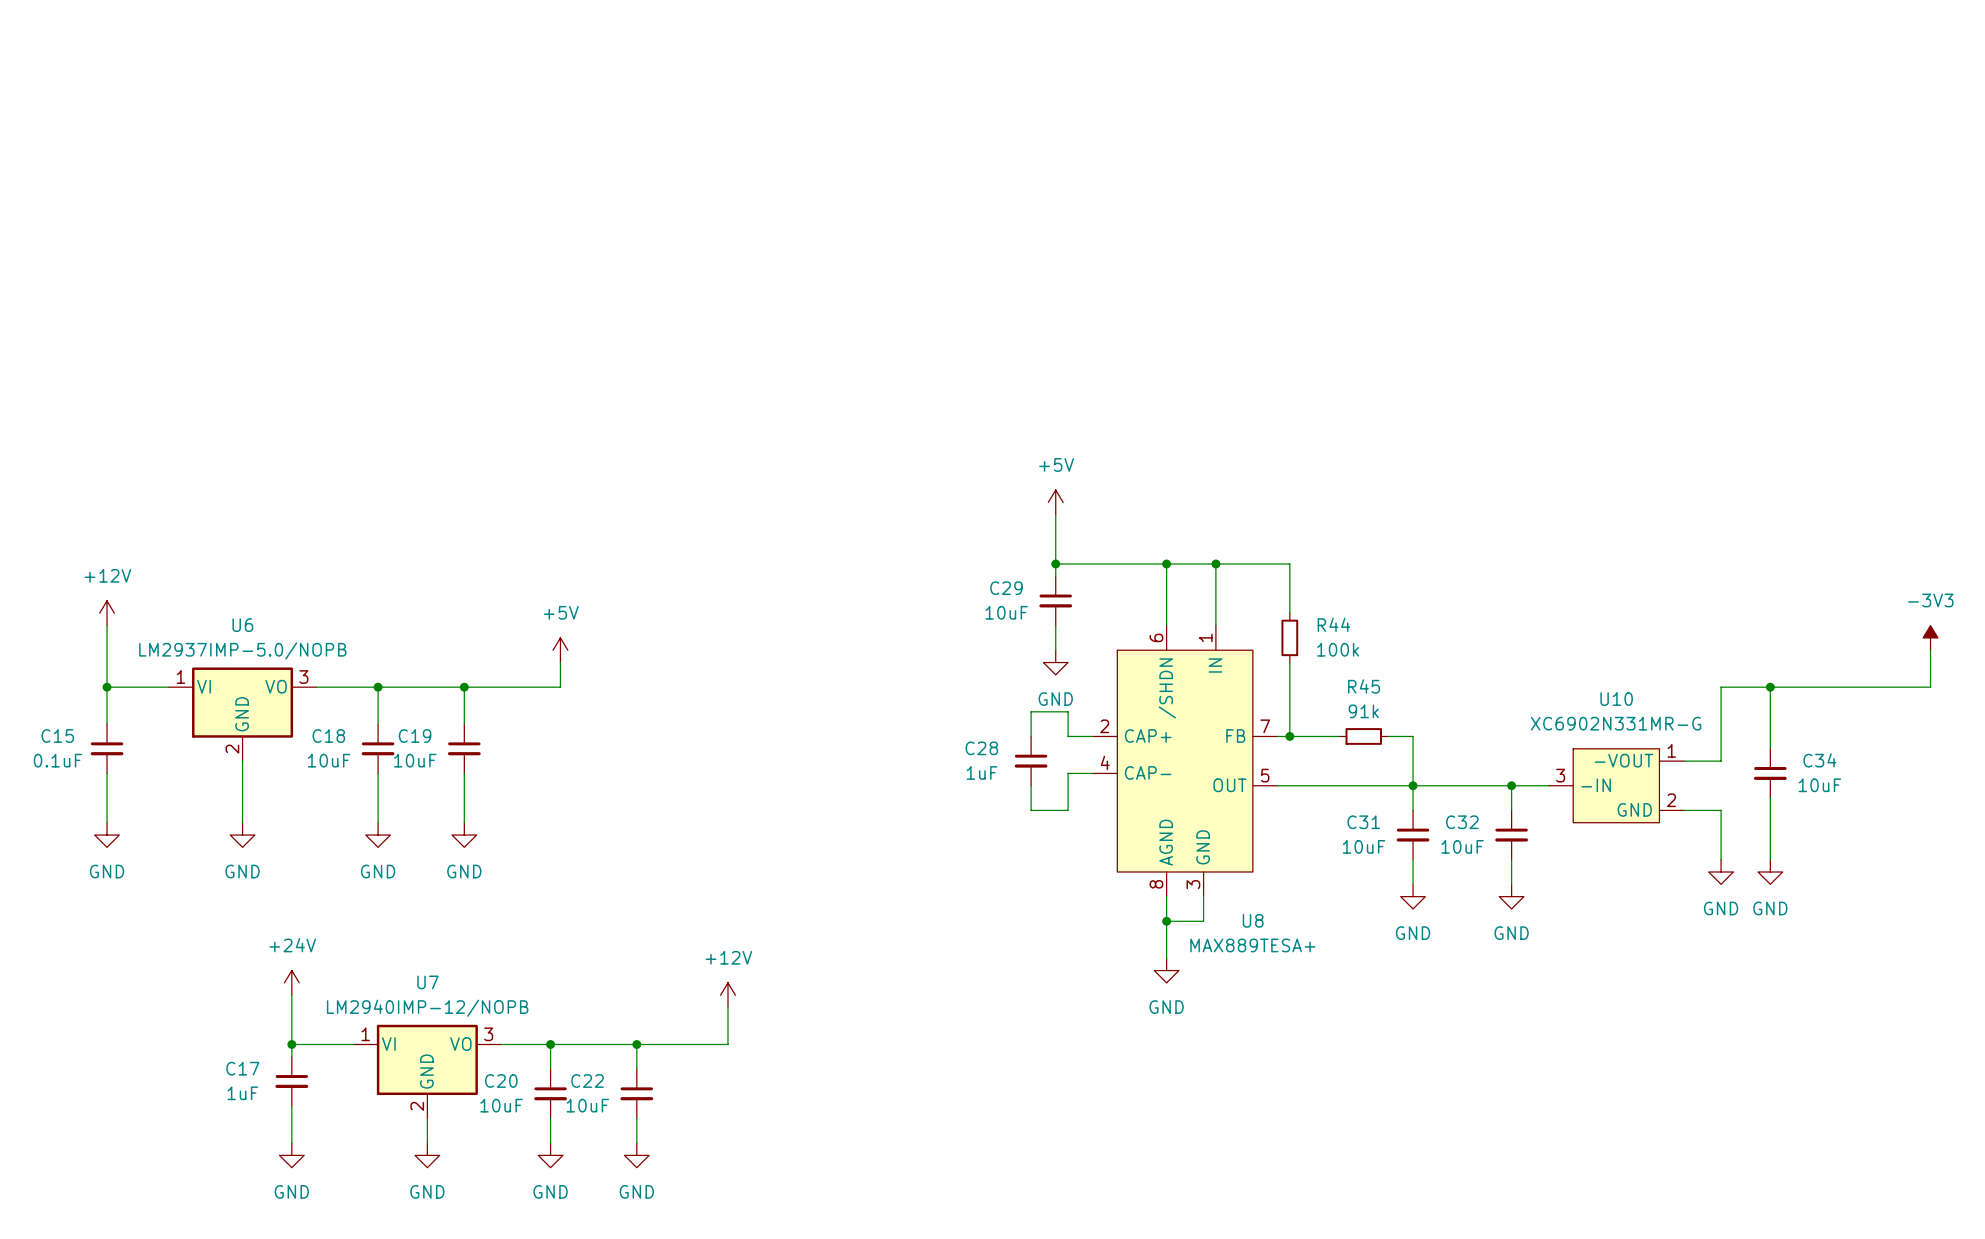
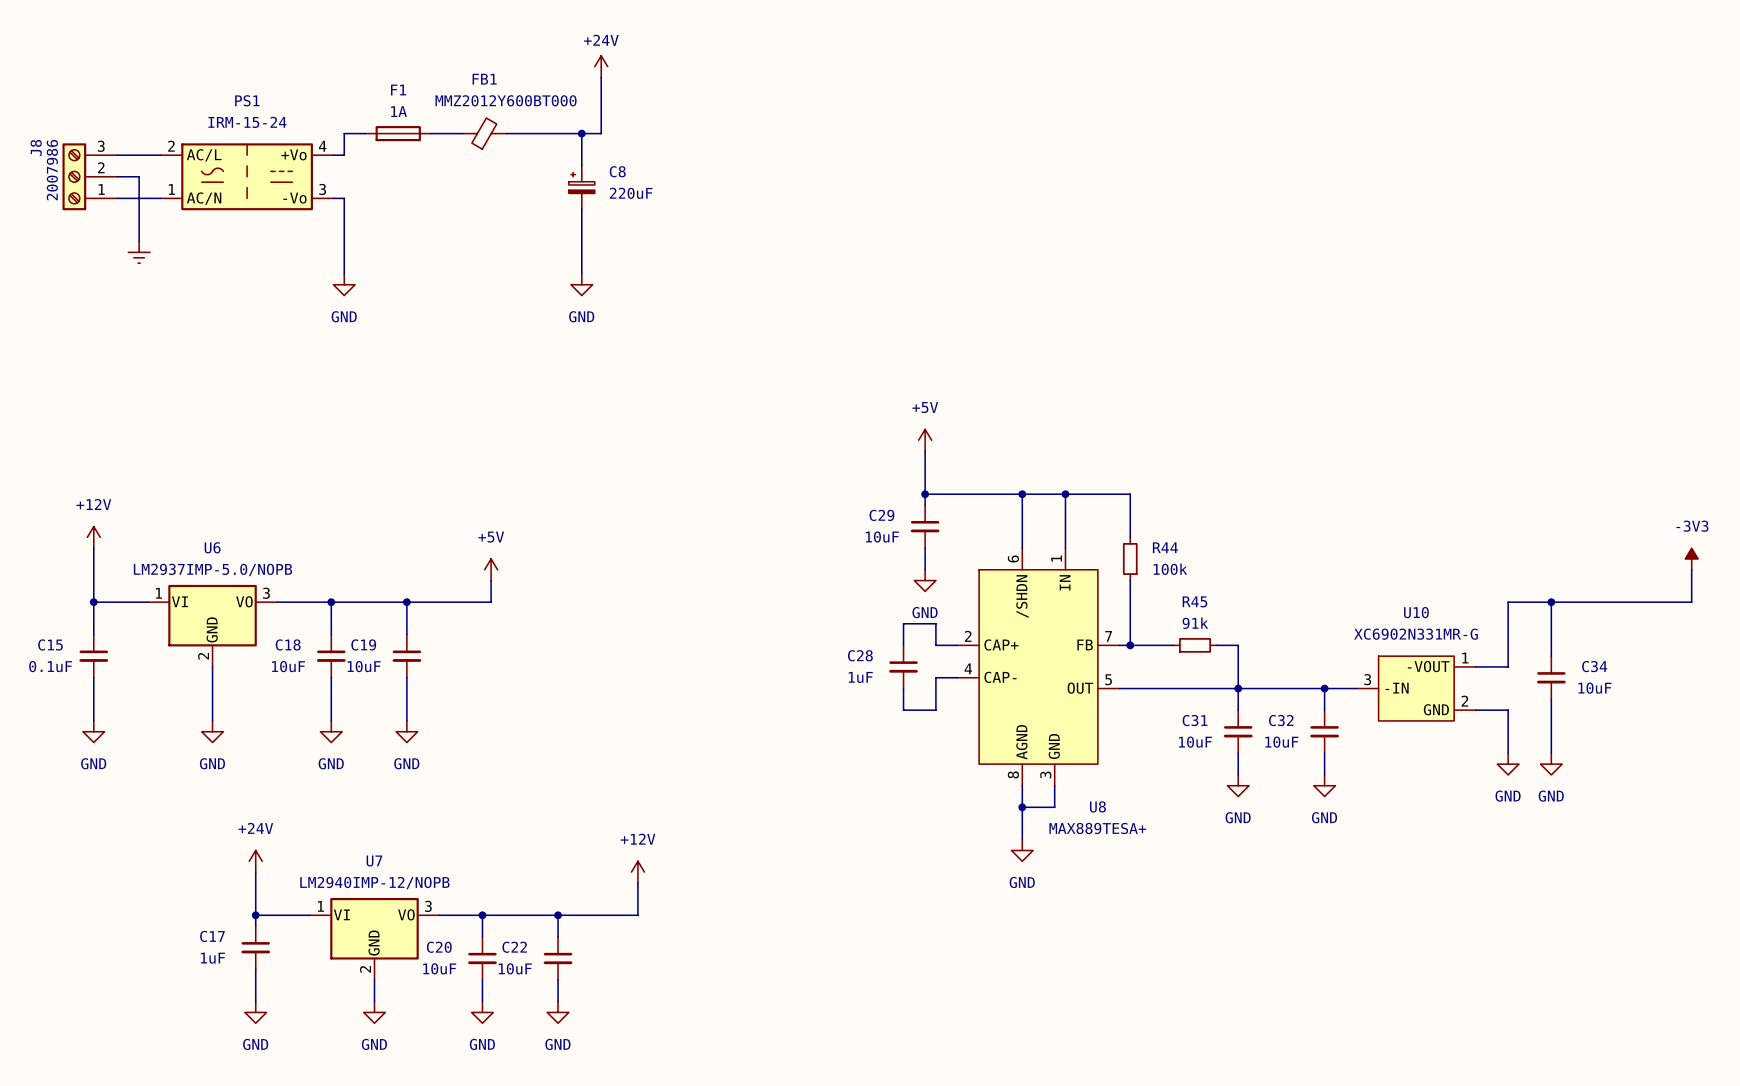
power symbol: none -> +24V (601, 66)
wire: none -> (601, 77) (601, 133) (506, 133)
wire: none -> (365, 133) (344, 133) (344, 155) (333, 155)
F1: none -> 1A (398, 133)
wire: none -> (430, 133) (463, 133)
FB1: none -> MMZ2012Y600BT000 (484, 133)
wire: none -> (581, 133) (581, 165)
junction: none -> (581, 133)
wire: none -> (117, 155) (160, 155)
J8: none -> 2007986 (90, 176)
wire: none -> (117, 176) (139, 176) (139, 241)
PS1: none -> IRM-15-24 (247, 176)
C8: none -> 220uF (581, 187)
wire: none -> (117, 198) (160, 198)
wire: none -> (333, 198) (344, 198) (344, 273)
wire: none -> (581, 209) (581, 273)
power symbol: none -> (139, 252)
power symbol: none -> GND (344, 284)
power symbol: none -> GND (581, 284)

